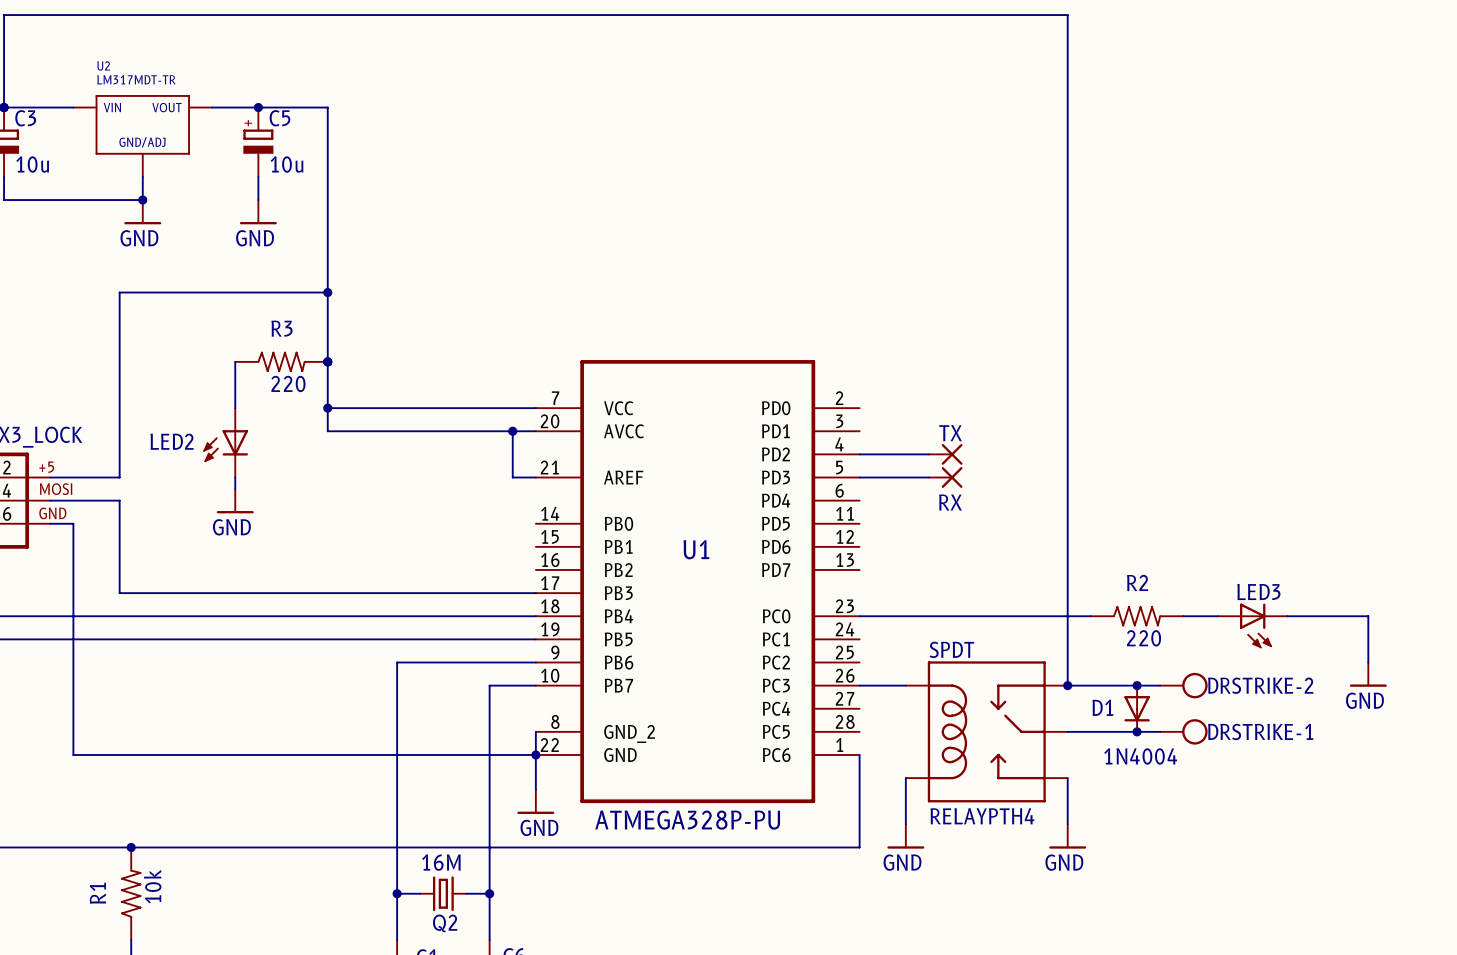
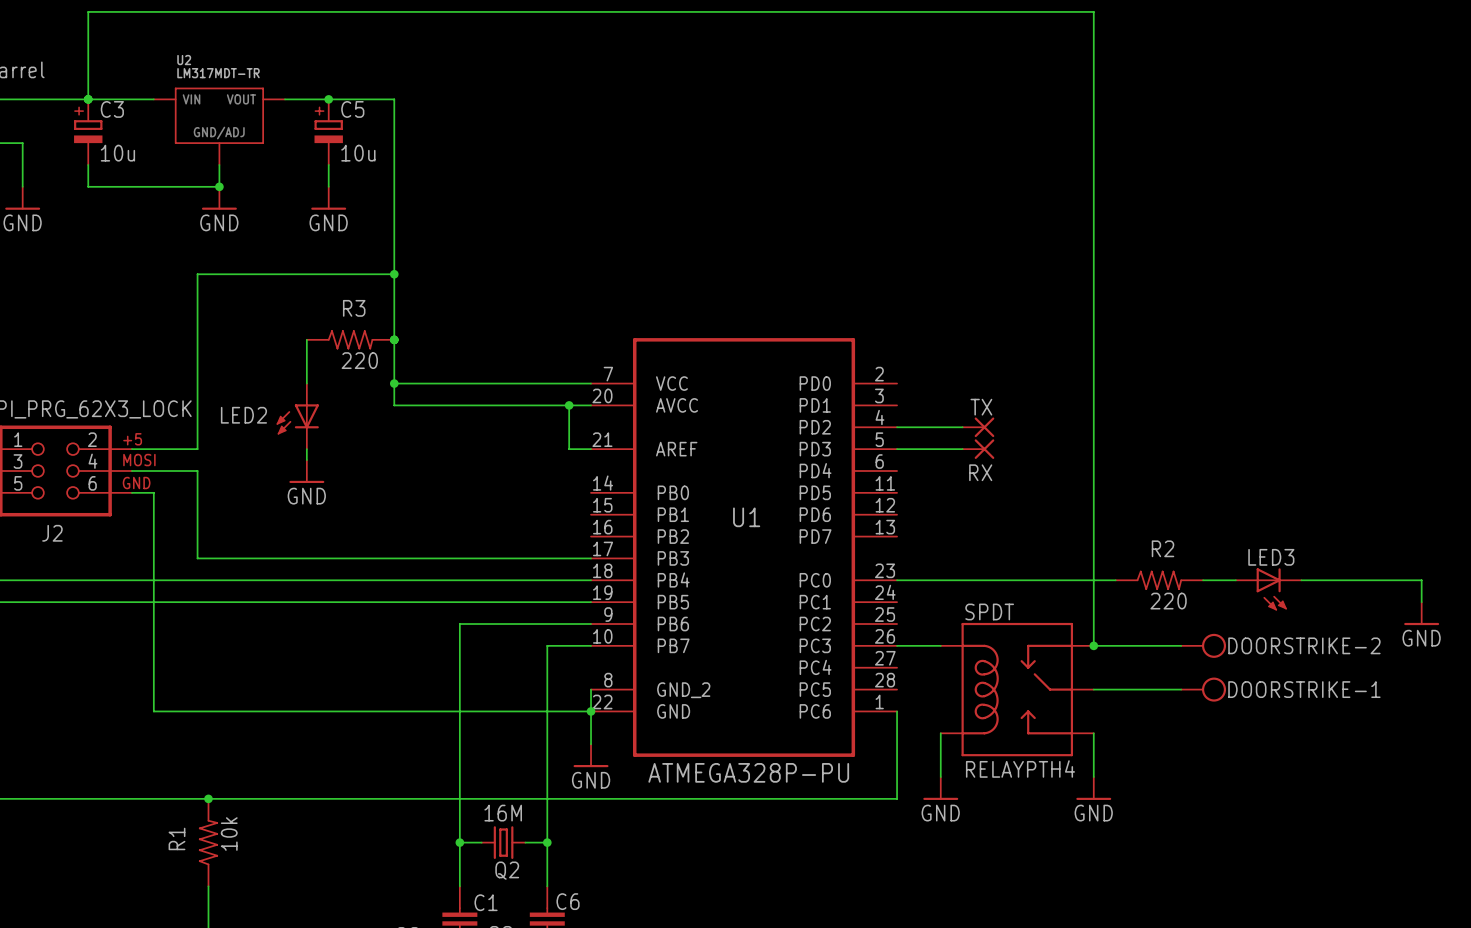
wire: (1368, 616) (1368, 662) -> (1377, 580) (1421, 580) (1421, 602)
power symbol position: GND (1368, 674) -> GND (1421, 613)
junction: (1137, 685) -> none
DRSTRIKE-2 name: DRSTRIKE-2 (1260, 685) -> DOORSTRIKE-2 (1304, 645)
D1: 1N4004 (1137, 708) -> none
junction: (1137, 731) -> none
DRSTRIKE-1 name: DRSTRIKE-1 (1260, 731) -> DOORSTRIKE-1 (1304, 689)

